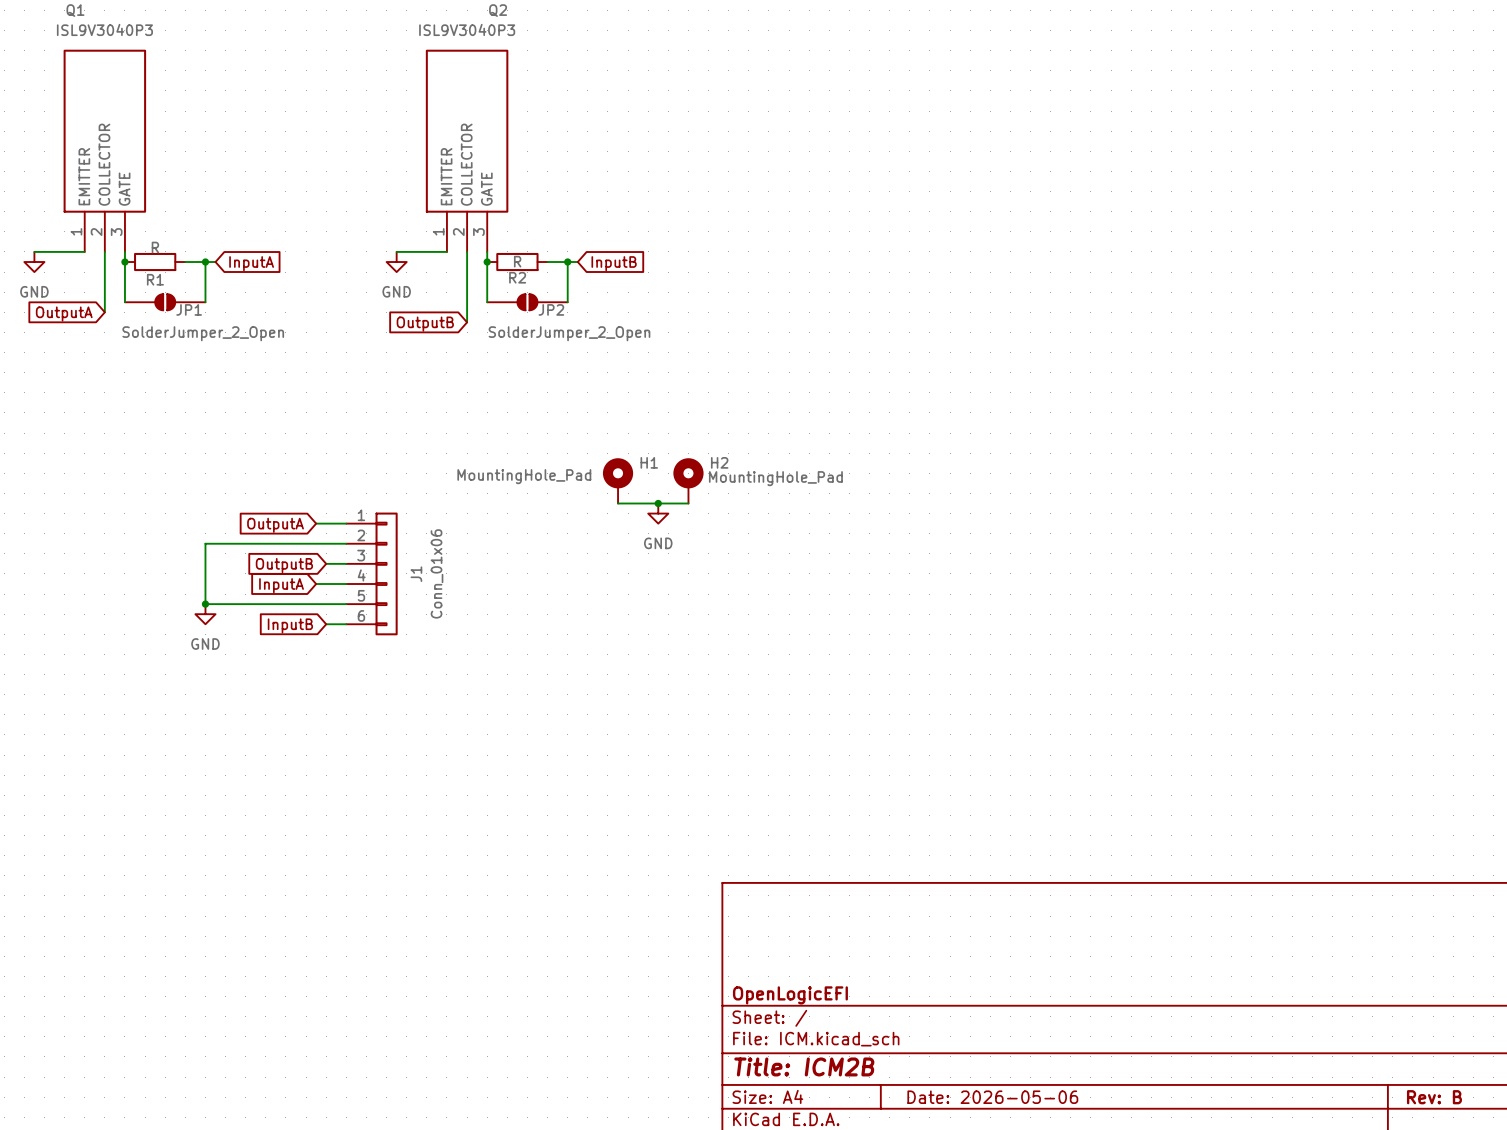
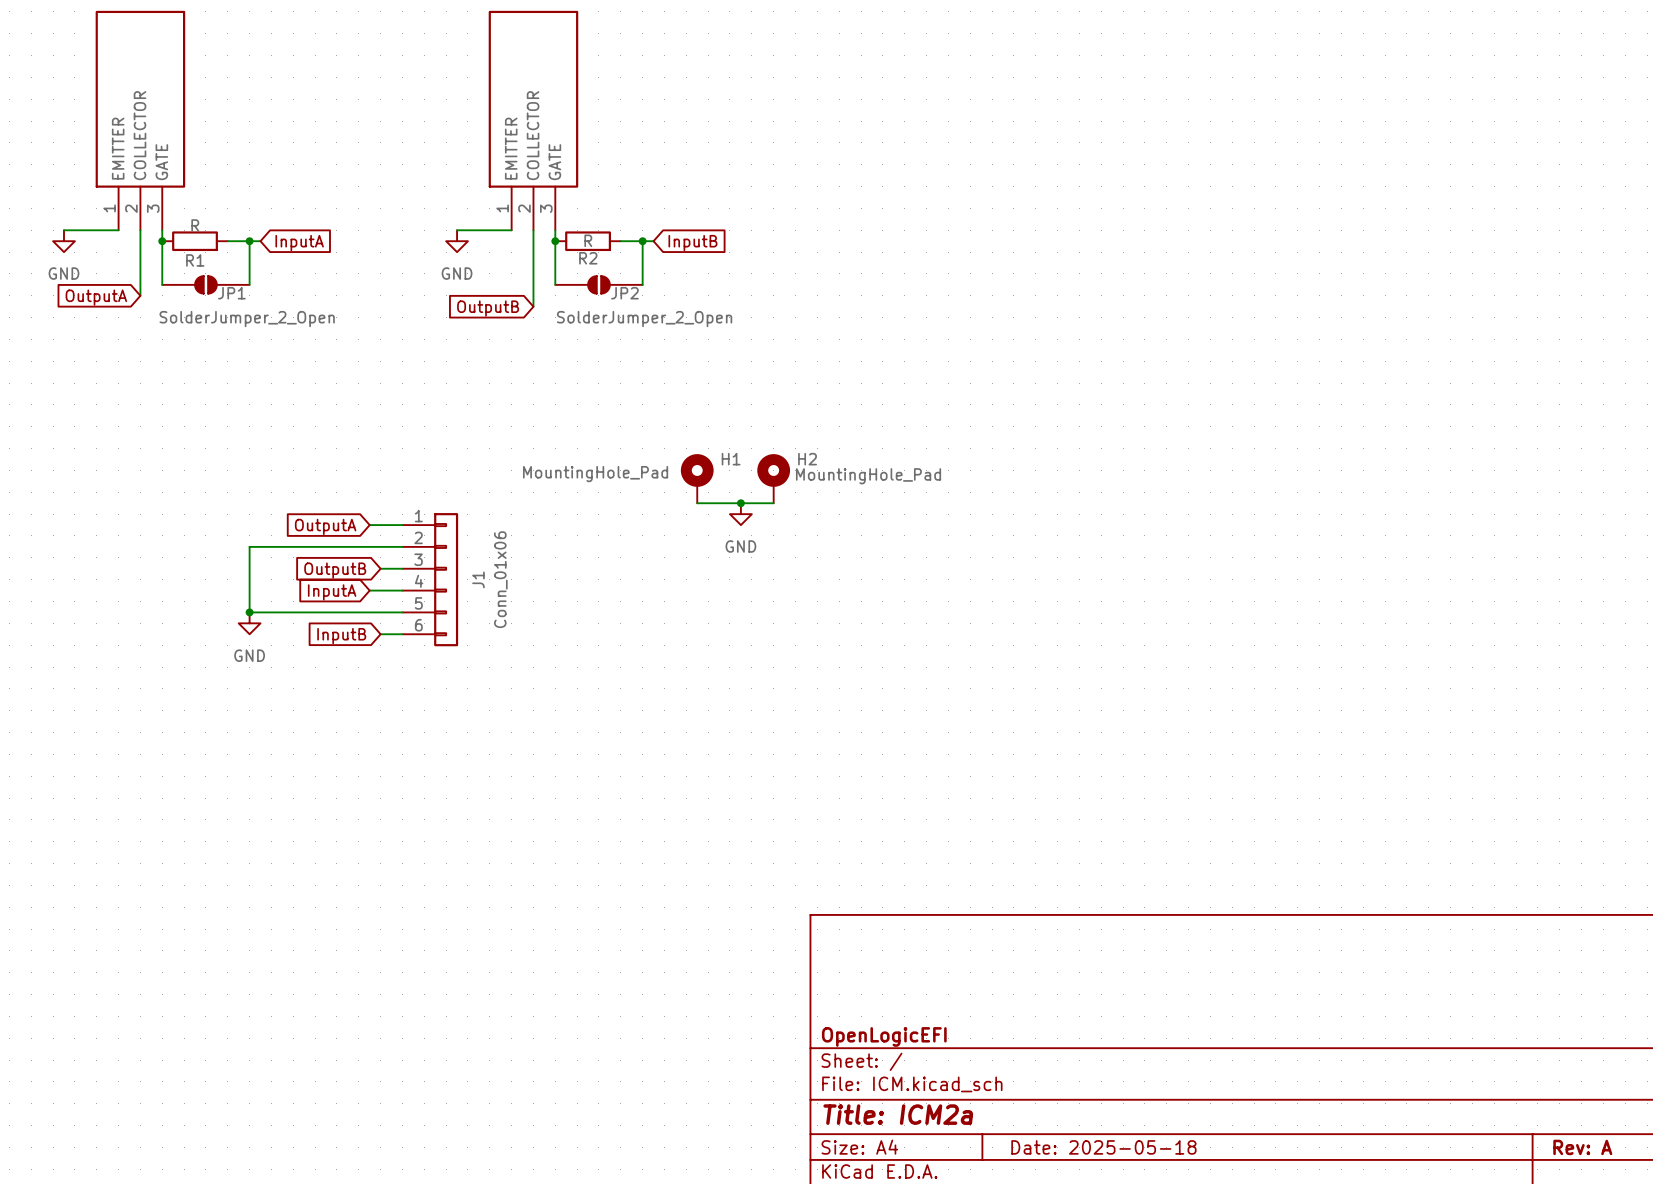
title block: Title: ICM2B (804, 1066) -> Title: ICM2a (898, 1114)
title block: Date: 2026-05-06 (992, 1097) -> Date: 2025-05-18 (1103, 1147)
title block: Rev: B (1434, 1097) -> Rev: A (1582, 1147)

